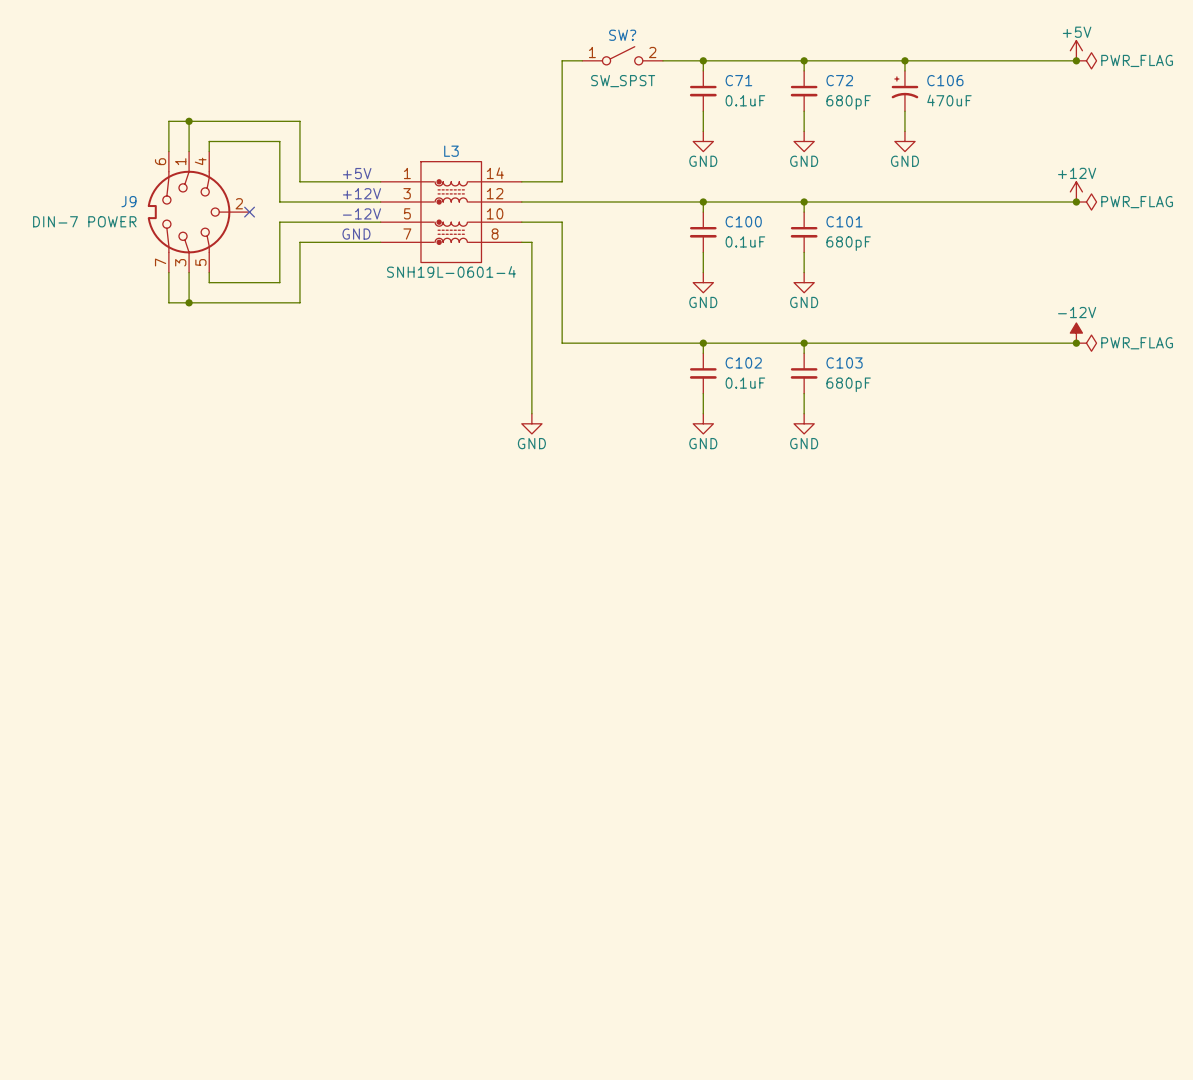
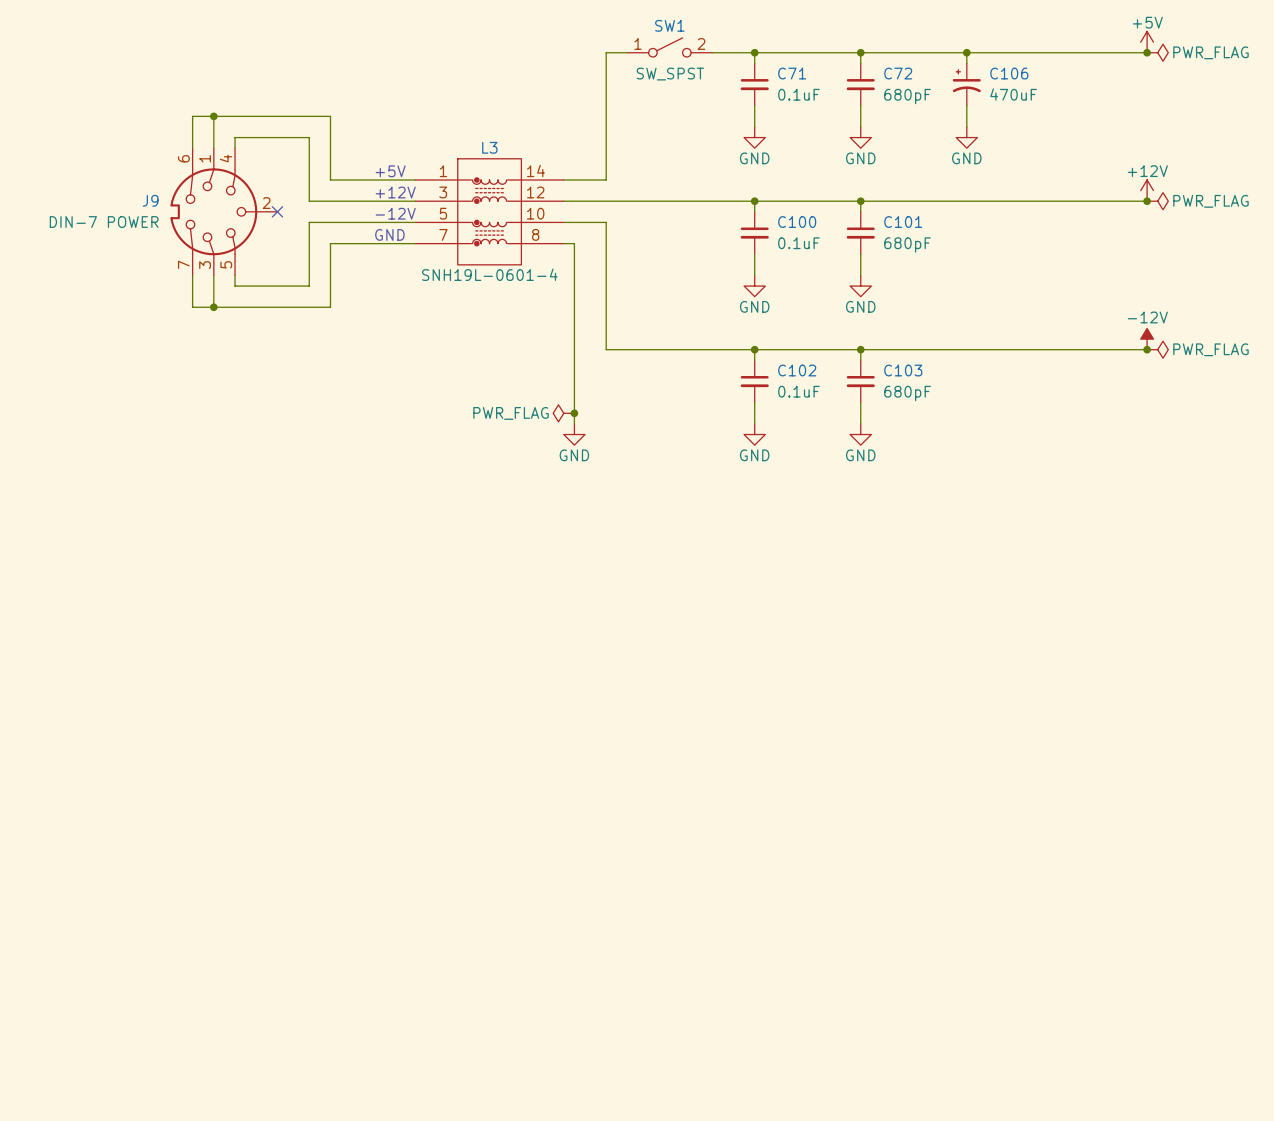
SW? name: SW? (622, 35) -> SW1 (669, 25)
power symbol: none -> PWR_FLAG (563, 413)
junction: none -> (574, 413)

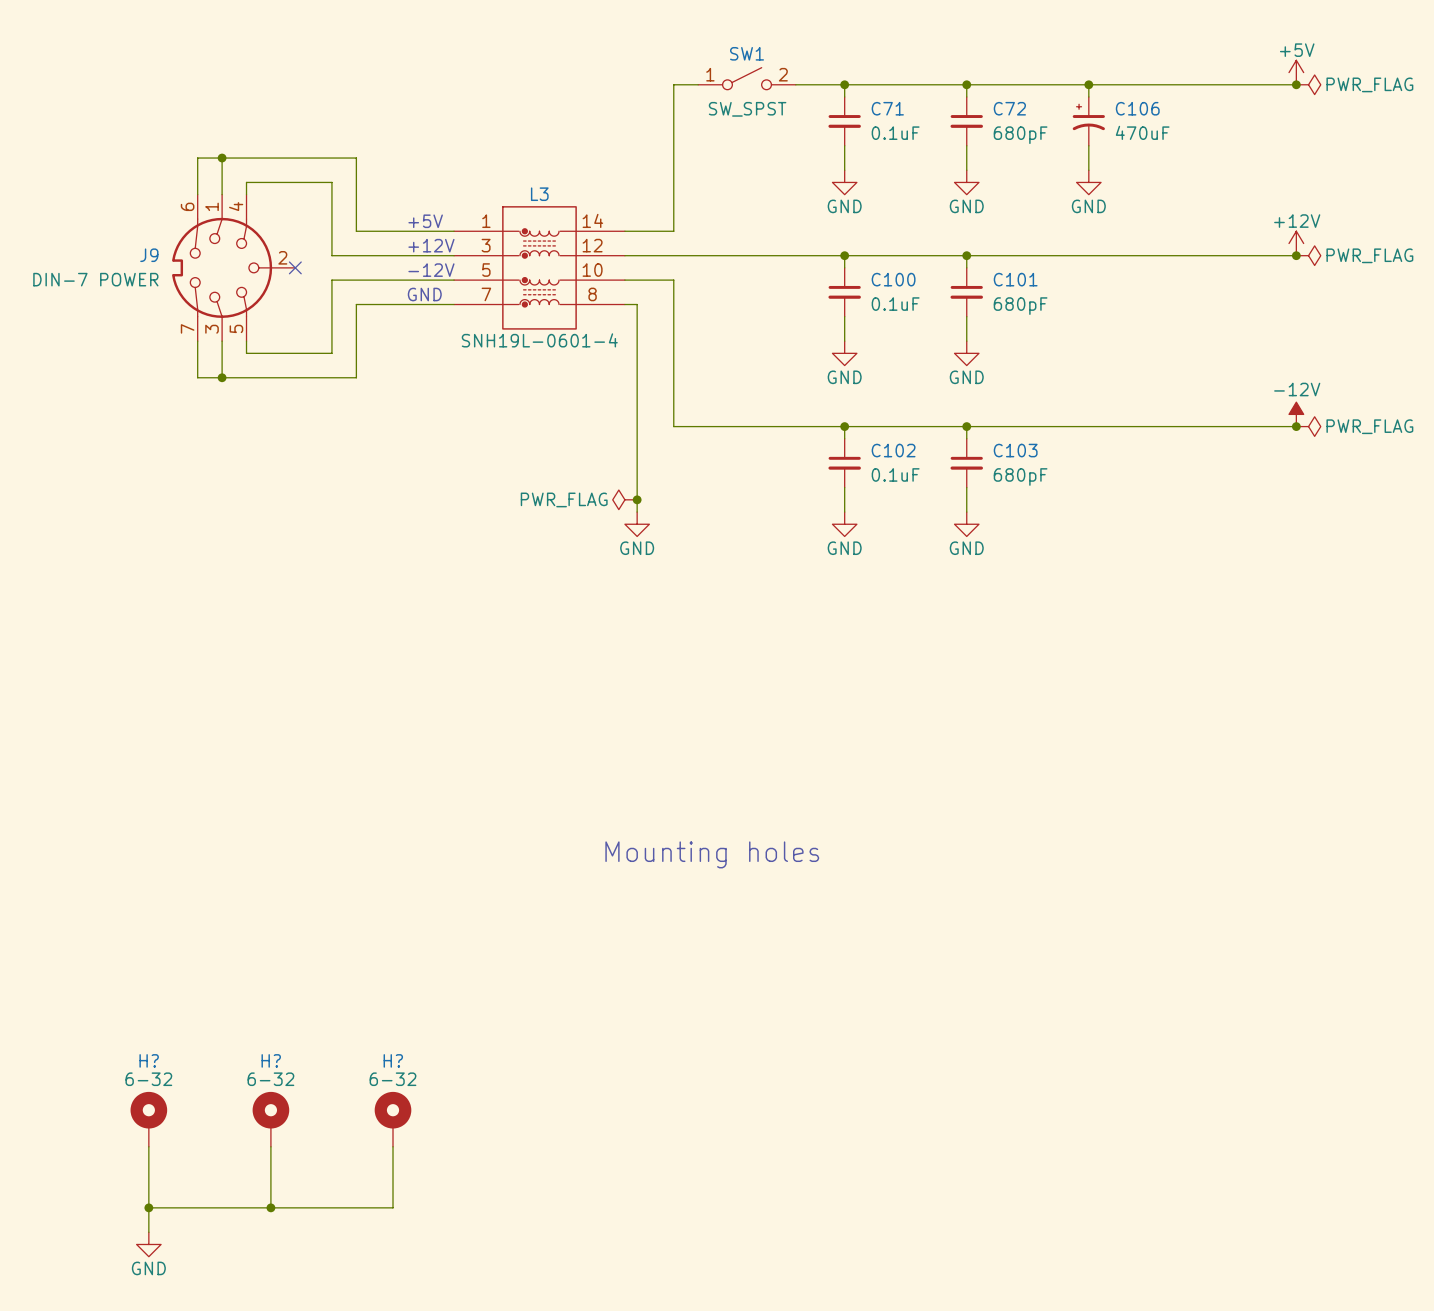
text: none -> Mounting holes (712, 854)
H?: none -> 6-32 (148, 1119)
H?: none -> 6-32 (270, 1119)
H?: none -> 6-32 (393, 1119)
wire: none -> (148, 1146) (148, 1232)
wire: none -> (270, 1146) (270, 1207)
wire: none -> (393, 1146) (393, 1207) (148, 1207)
junction: none -> (148, 1207)
junction: none -> (270, 1207)
power symbol: none -> GND (148, 1244)

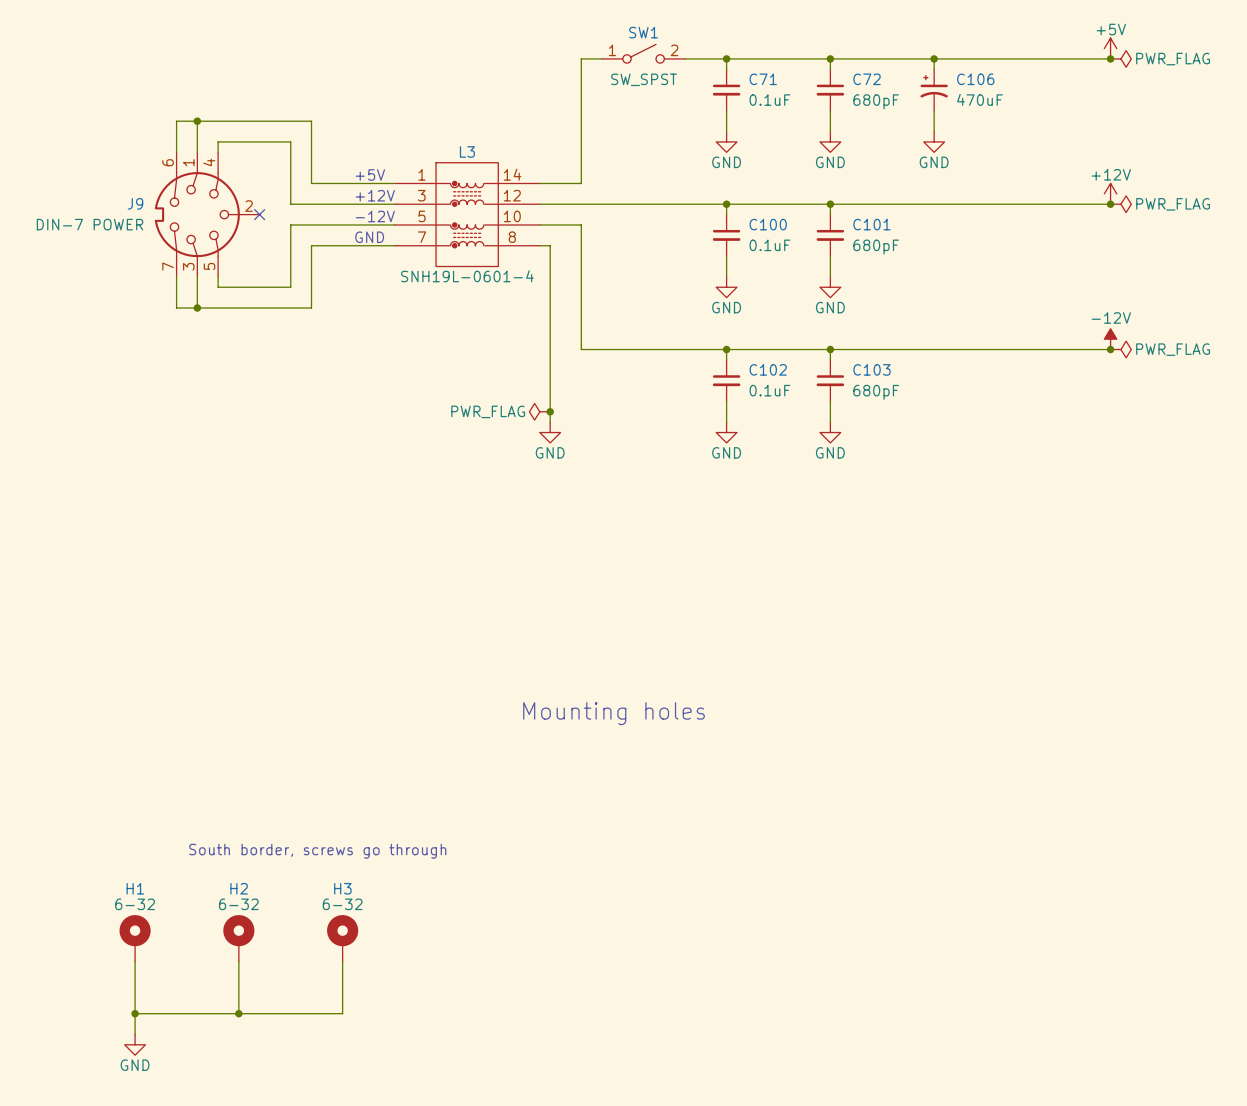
text: none -> South border, screws go through (317, 851)
H? name: H? (149, 1060) -> H1 (135, 888)
H? name: H? (271, 1060) -> H2 (239, 888)
H? name: H? (393, 1060) -> H3 (342, 888)

